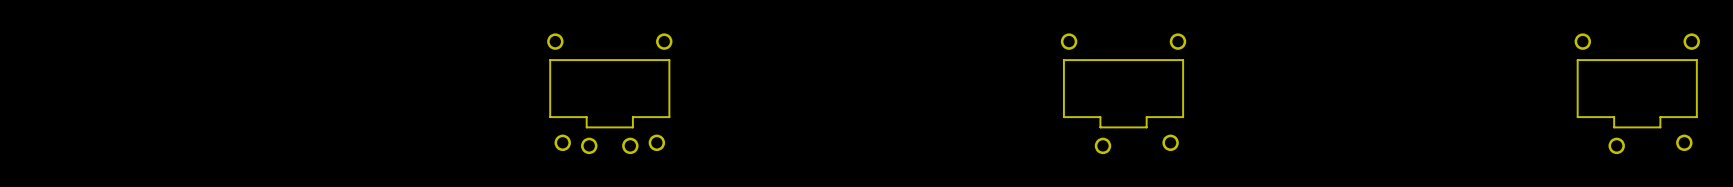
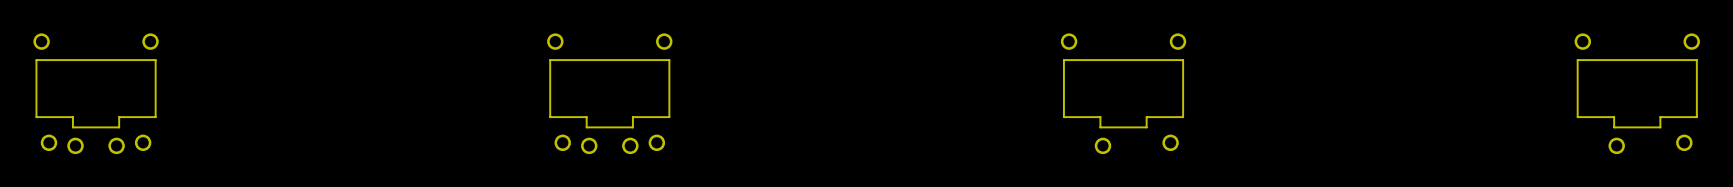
part: none -> (96, 93)

